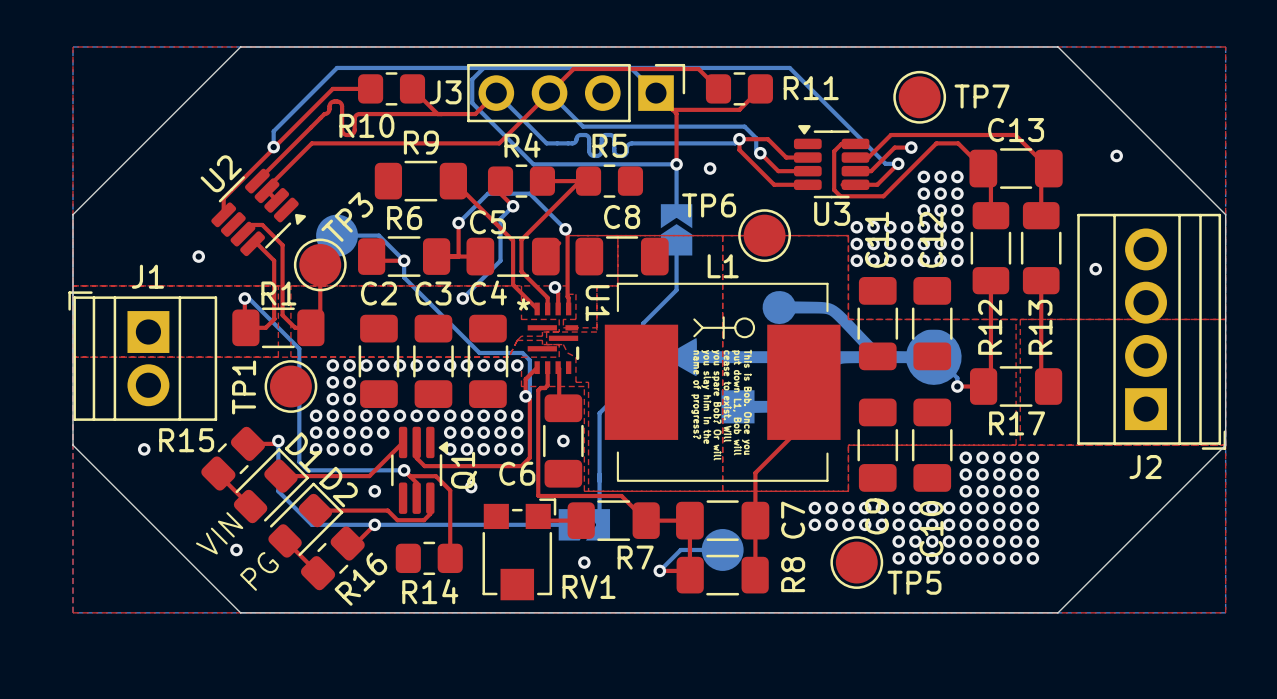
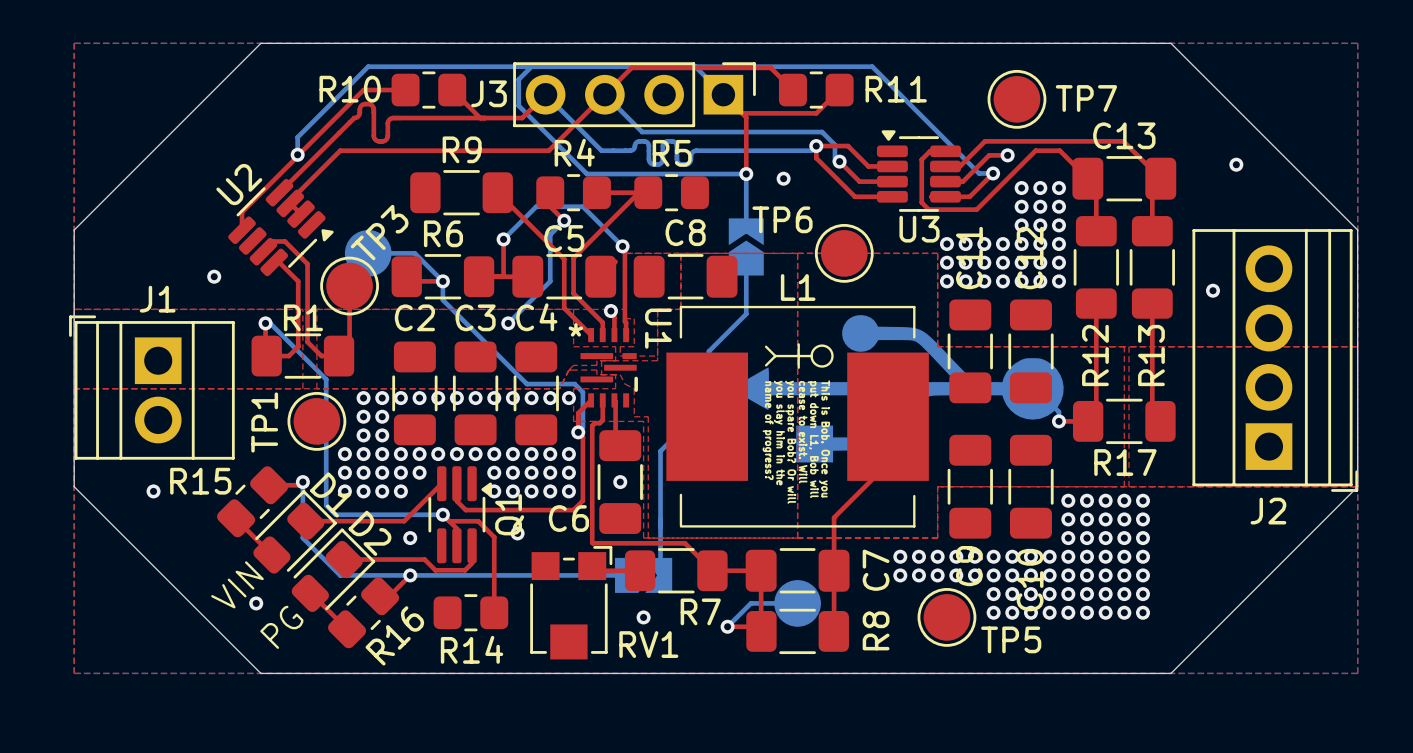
R10 name position: R10 (366, 125) -> R10 (350, 89)
C5 name position: C5 (487, 222) -> C5 (564, 238)

